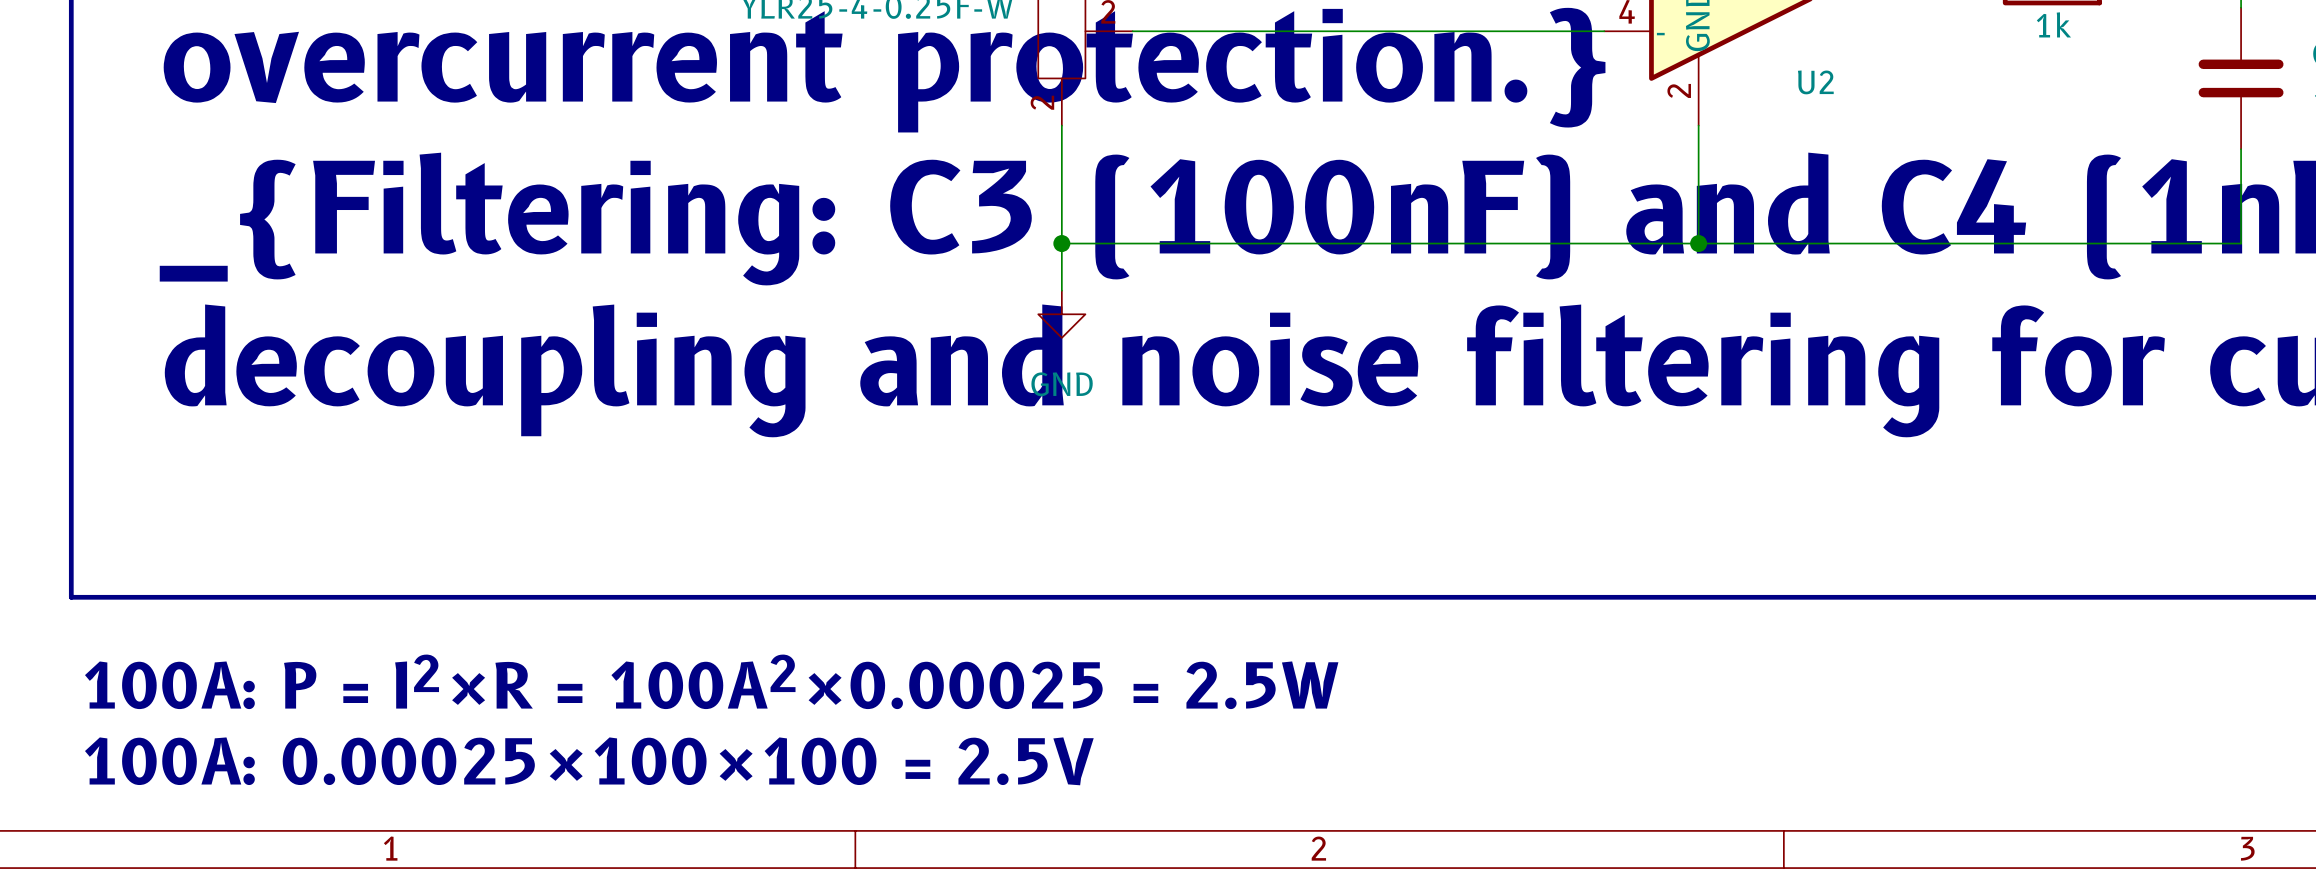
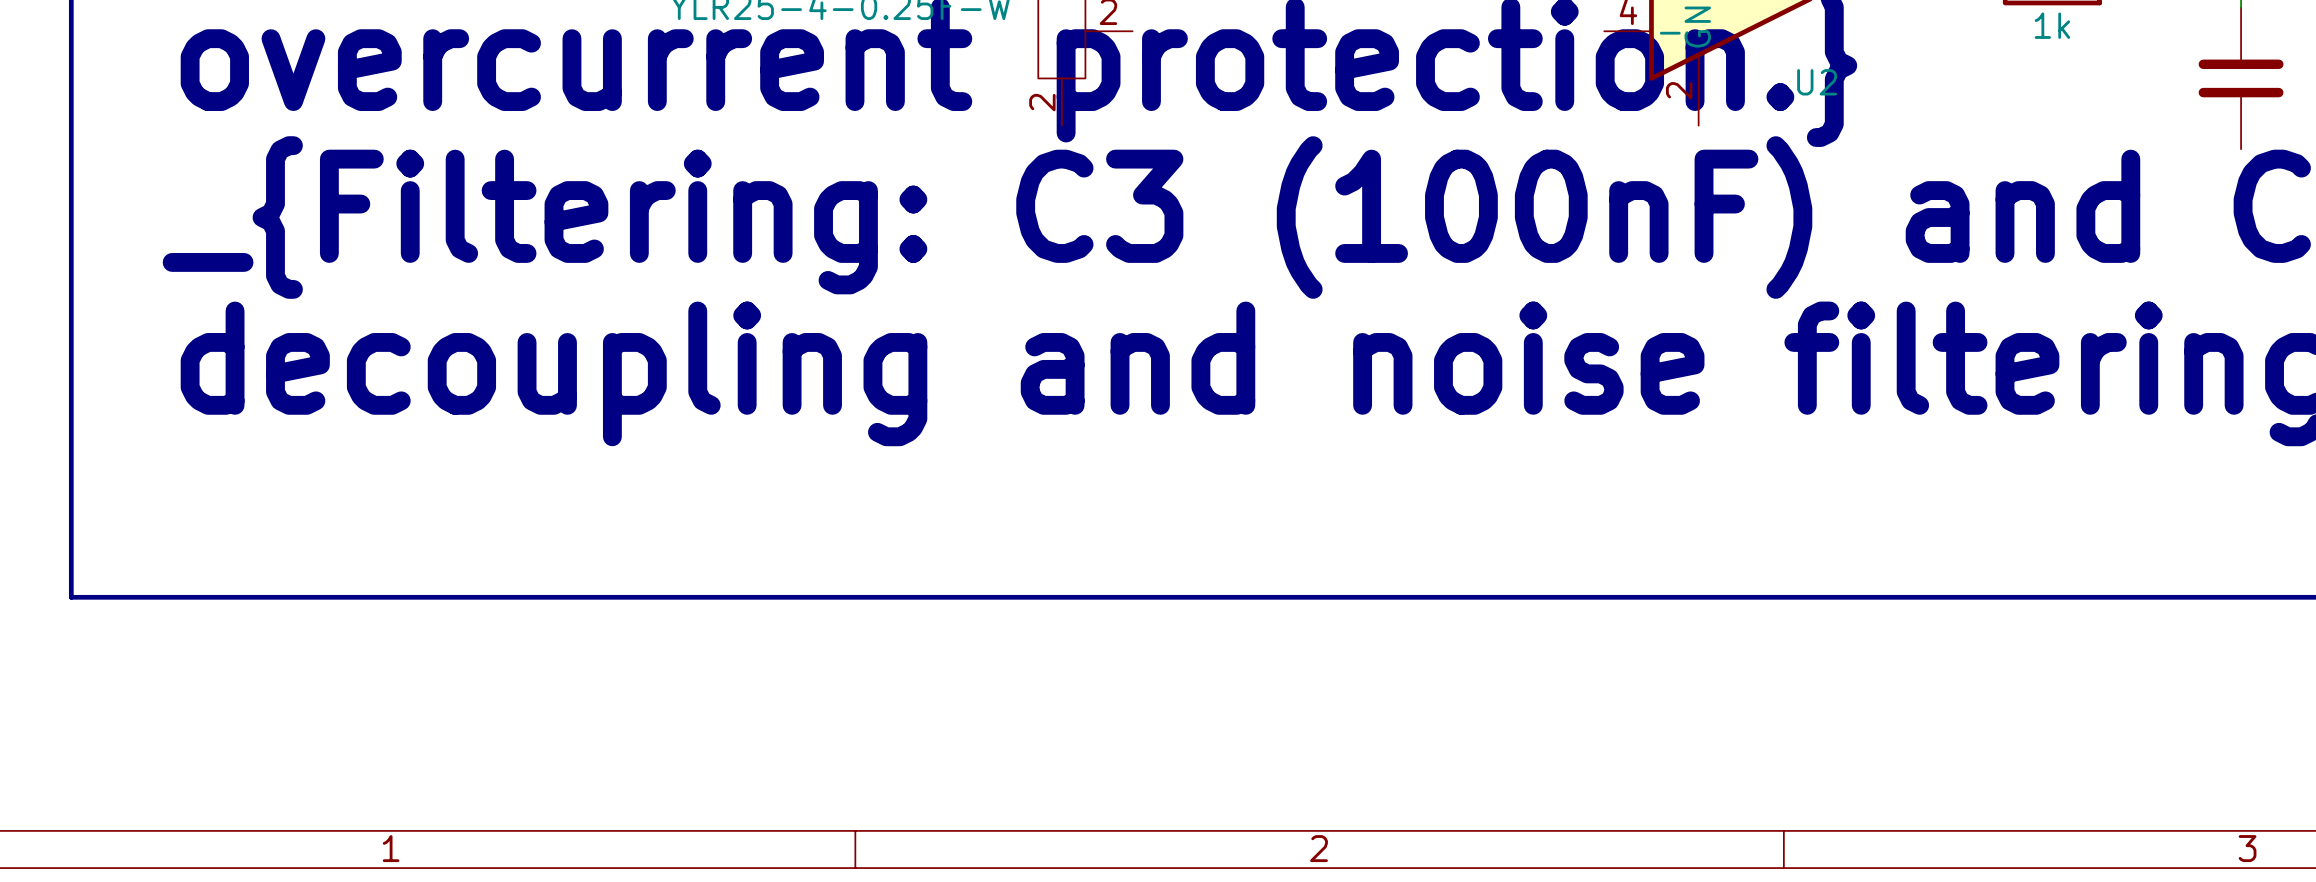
wire: (1132, 31) (1604, 31) -> none
wire: (1061, 125) (1061, 290) -> none
wire: (1698, 125) (1698, 243) -> none
wire: (2241, 149) (2241, 243) (1061, 243) -> none
junction: (1061, 243) -> none
junction: (1698, 243) -> none
power symbol: GND (1061, 314) -> none
text: 100A: P = I2×R = 100A2×0.00025 = 2.5W (711, 681) -> none
text: 100A: 0.00025×100×100 = 2.5V (589, 761) -> none

